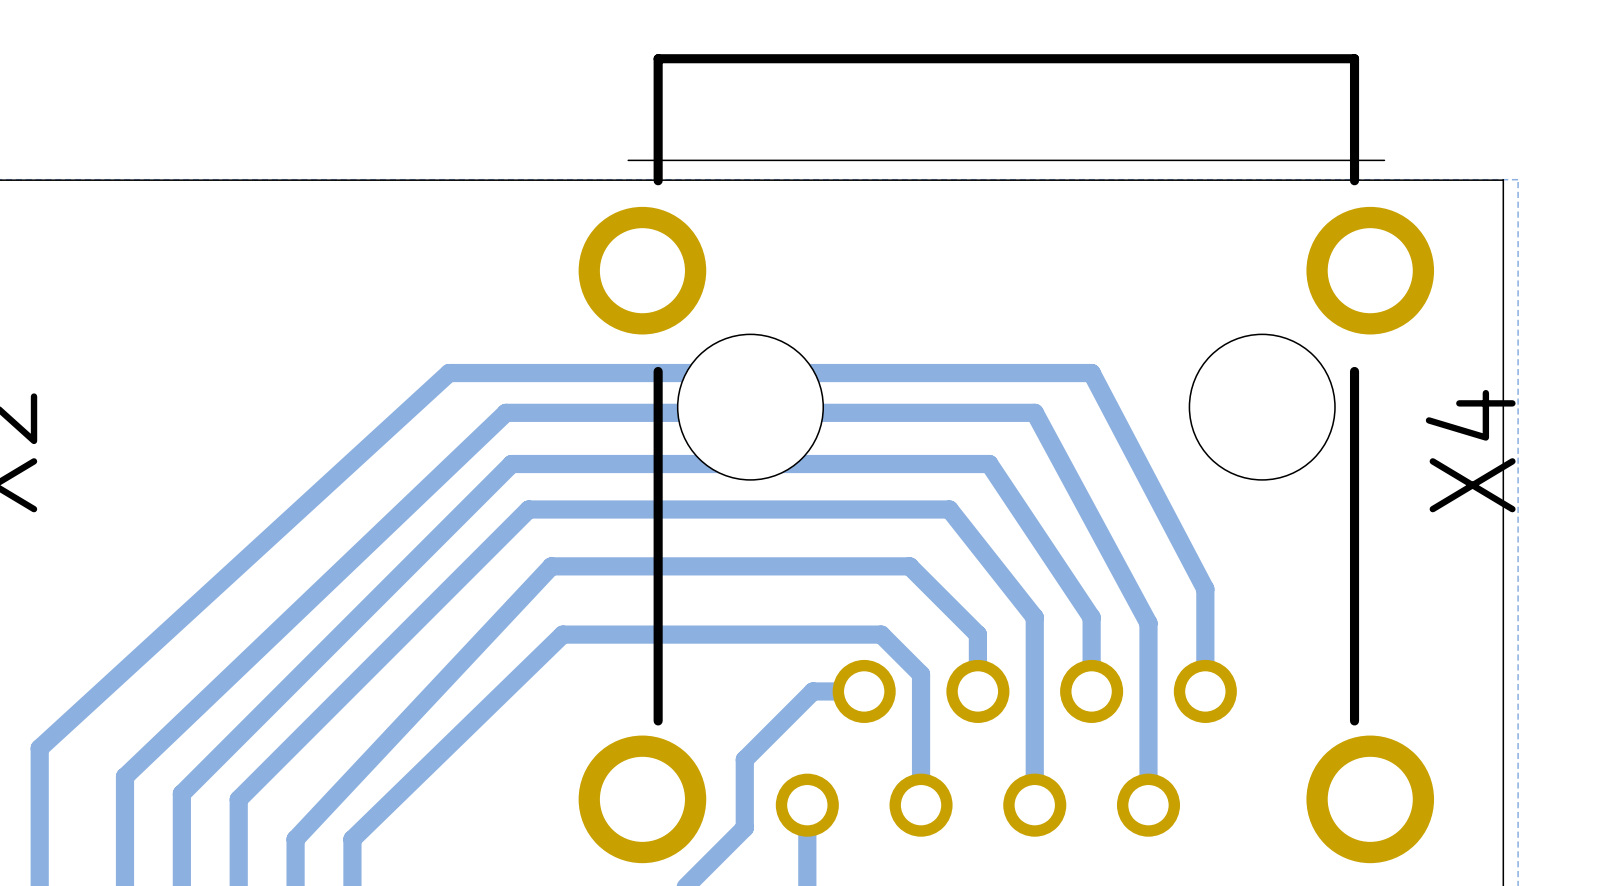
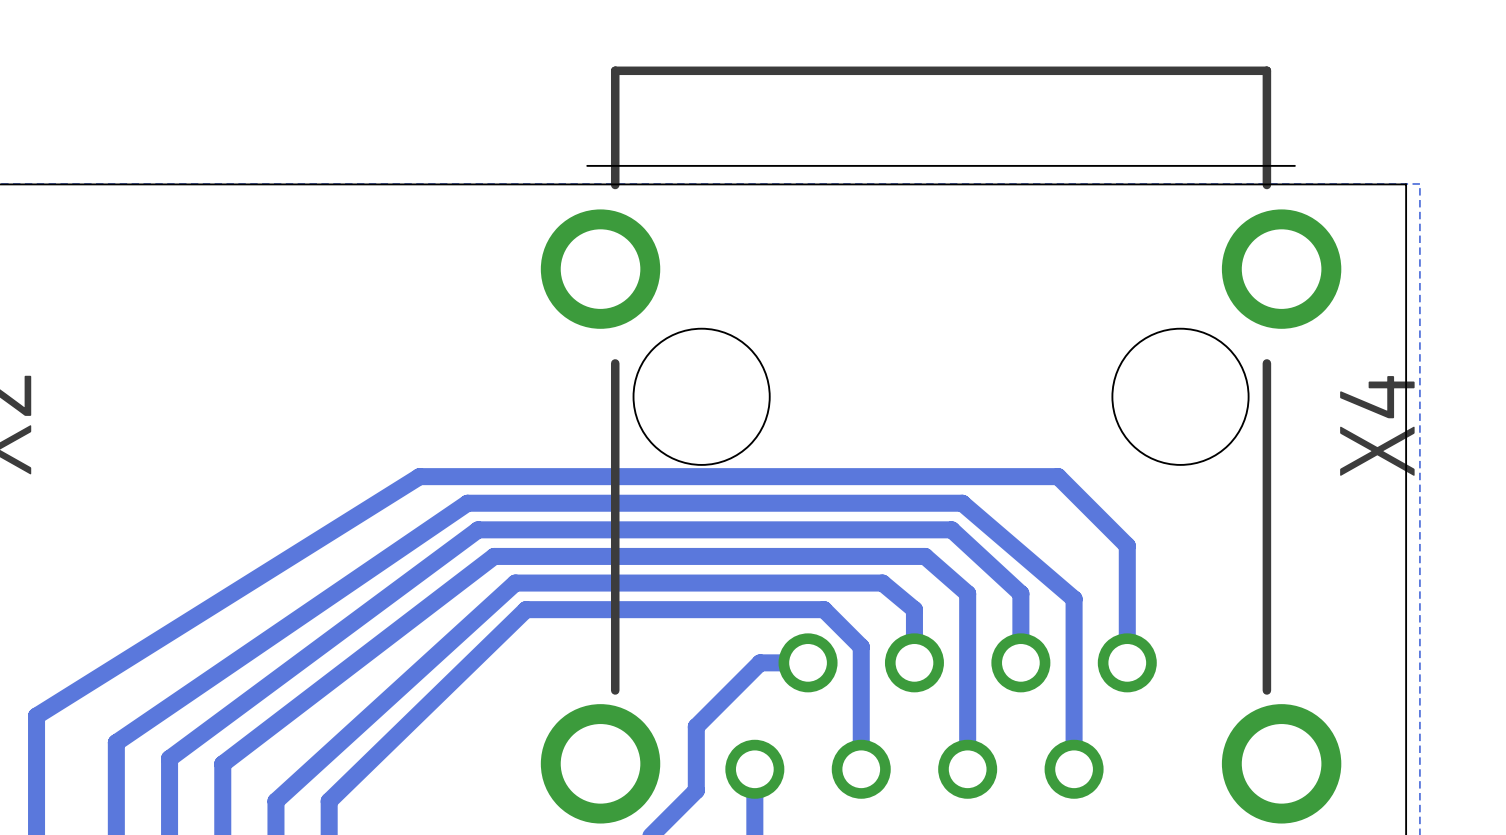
bottom track: (1205, 589) (1091, 373) (449, 373) (39, 748) -> (1127, 567) (1127, 545) (1058, 476) (419, 476) (36, 716)
bottom track: (1034, 617) (949, 509) (528, 509) (238, 799) -> (967, 593) (925, 556) (494, 556) (222, 763)
bottom track: (1091, 617) (989, 464) (511, 464) (181, 793) -> (1020, 593) (951, 529) (478, 529) (169, 758)
bottom track: (1148, 623) (1034, 412) (505, 412) (124, 776) -> (1074, 599) (962, 503) (467, 503) (116, 742)
bottom track: (977, 634) (909, 566) (551, 566) (295, 839) -> (914, 609) (882, 583) (515, 583) (275, 801)

